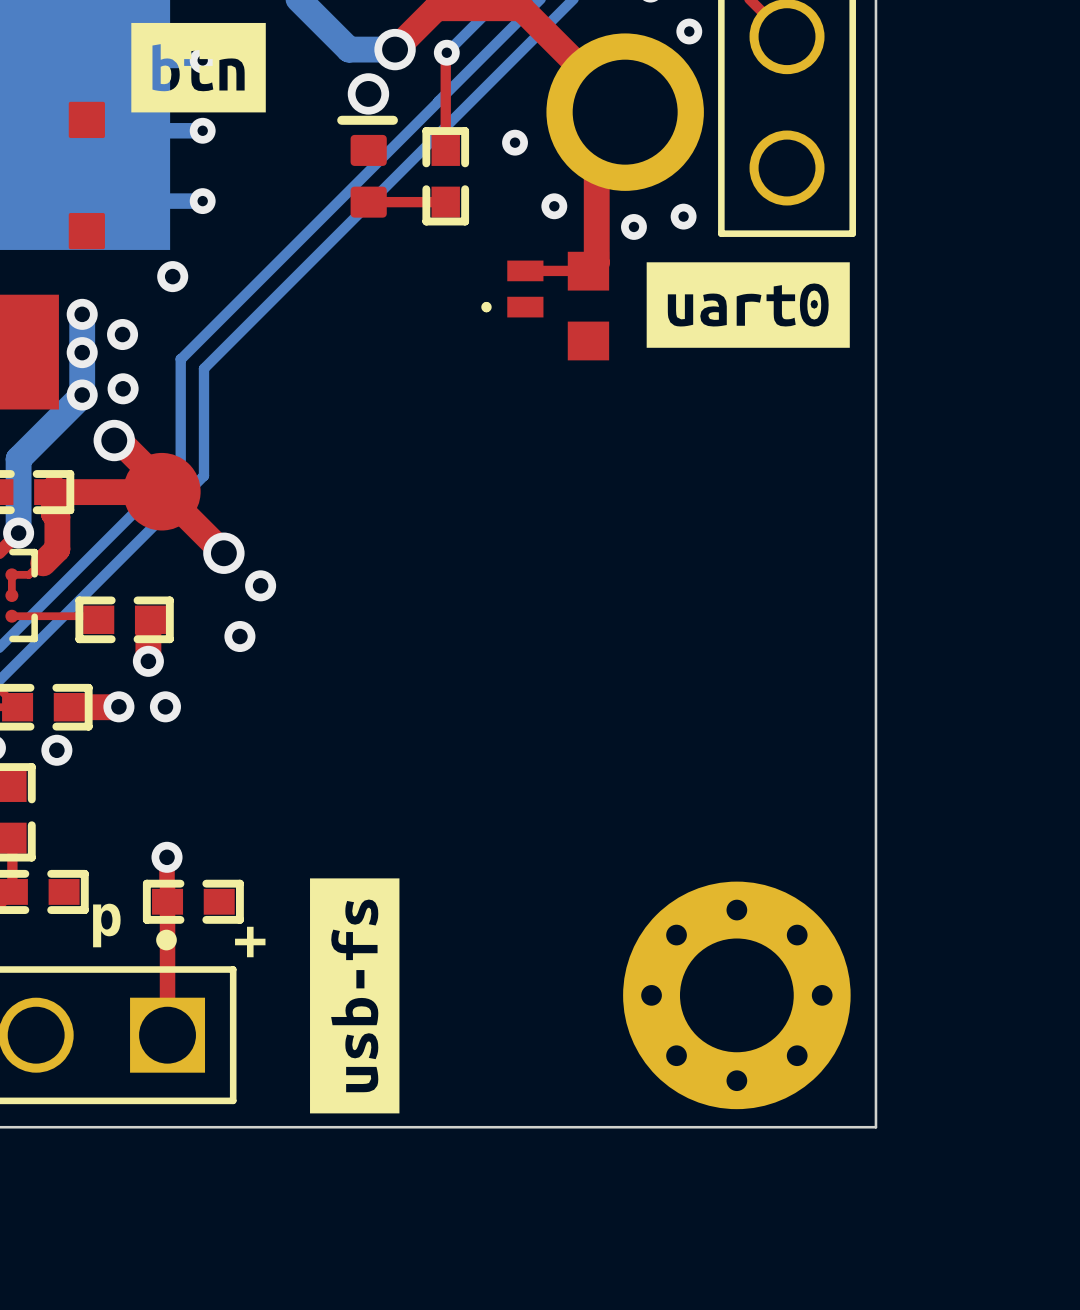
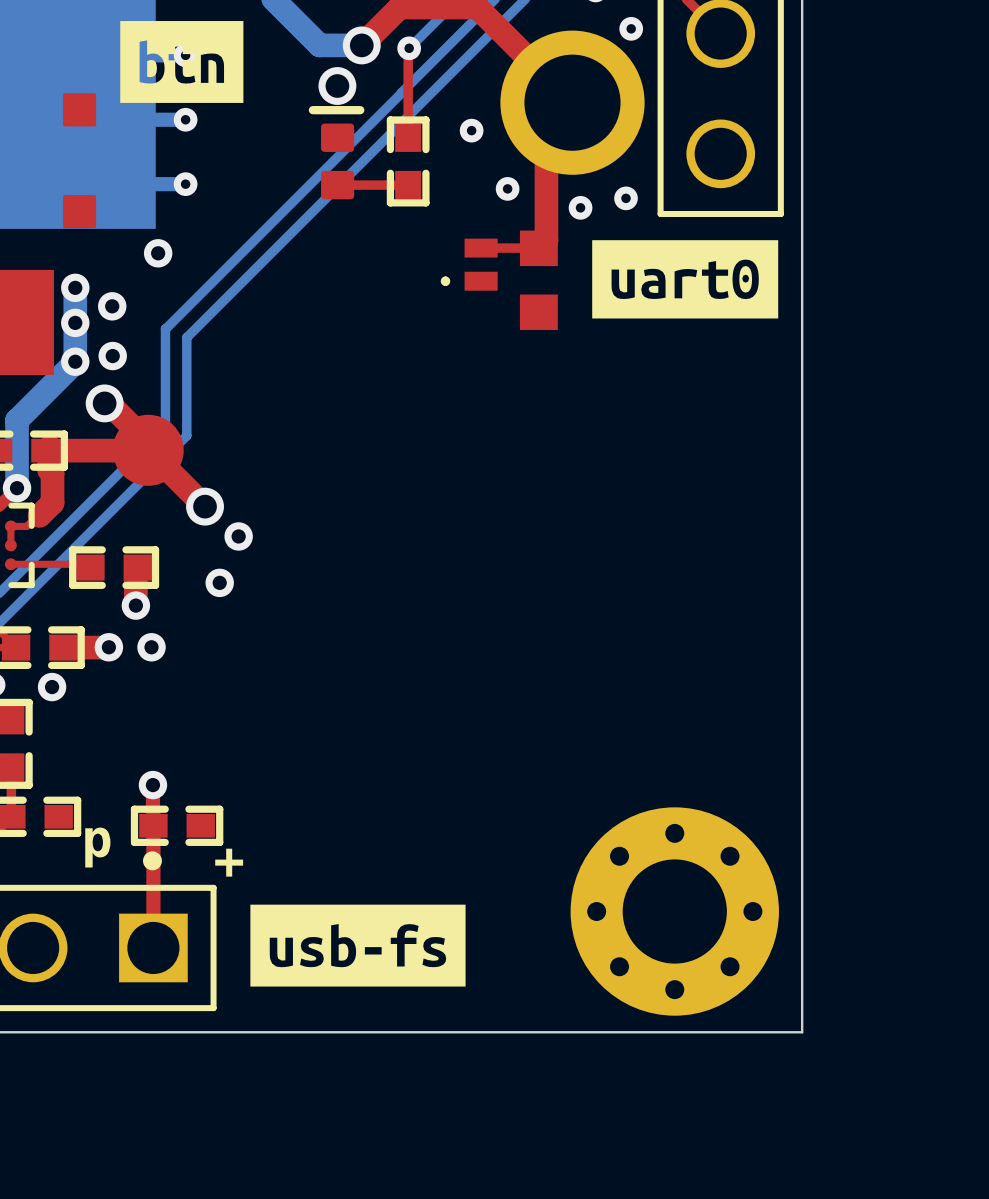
drawing shape: [310, 878, 400, 1114] -> [250, 904, 466, 987]

